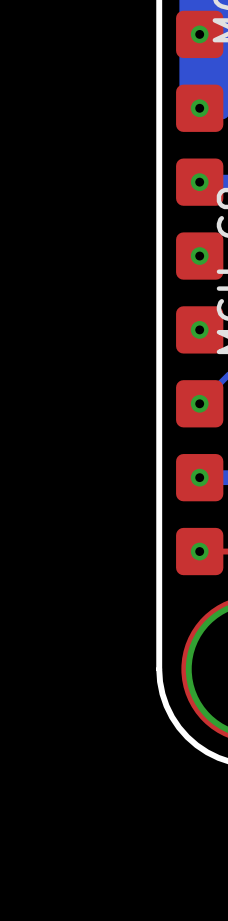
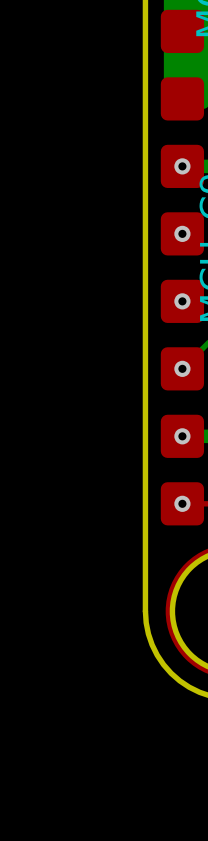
via: (199, 34) -> none
via: (199, 108) -> none

